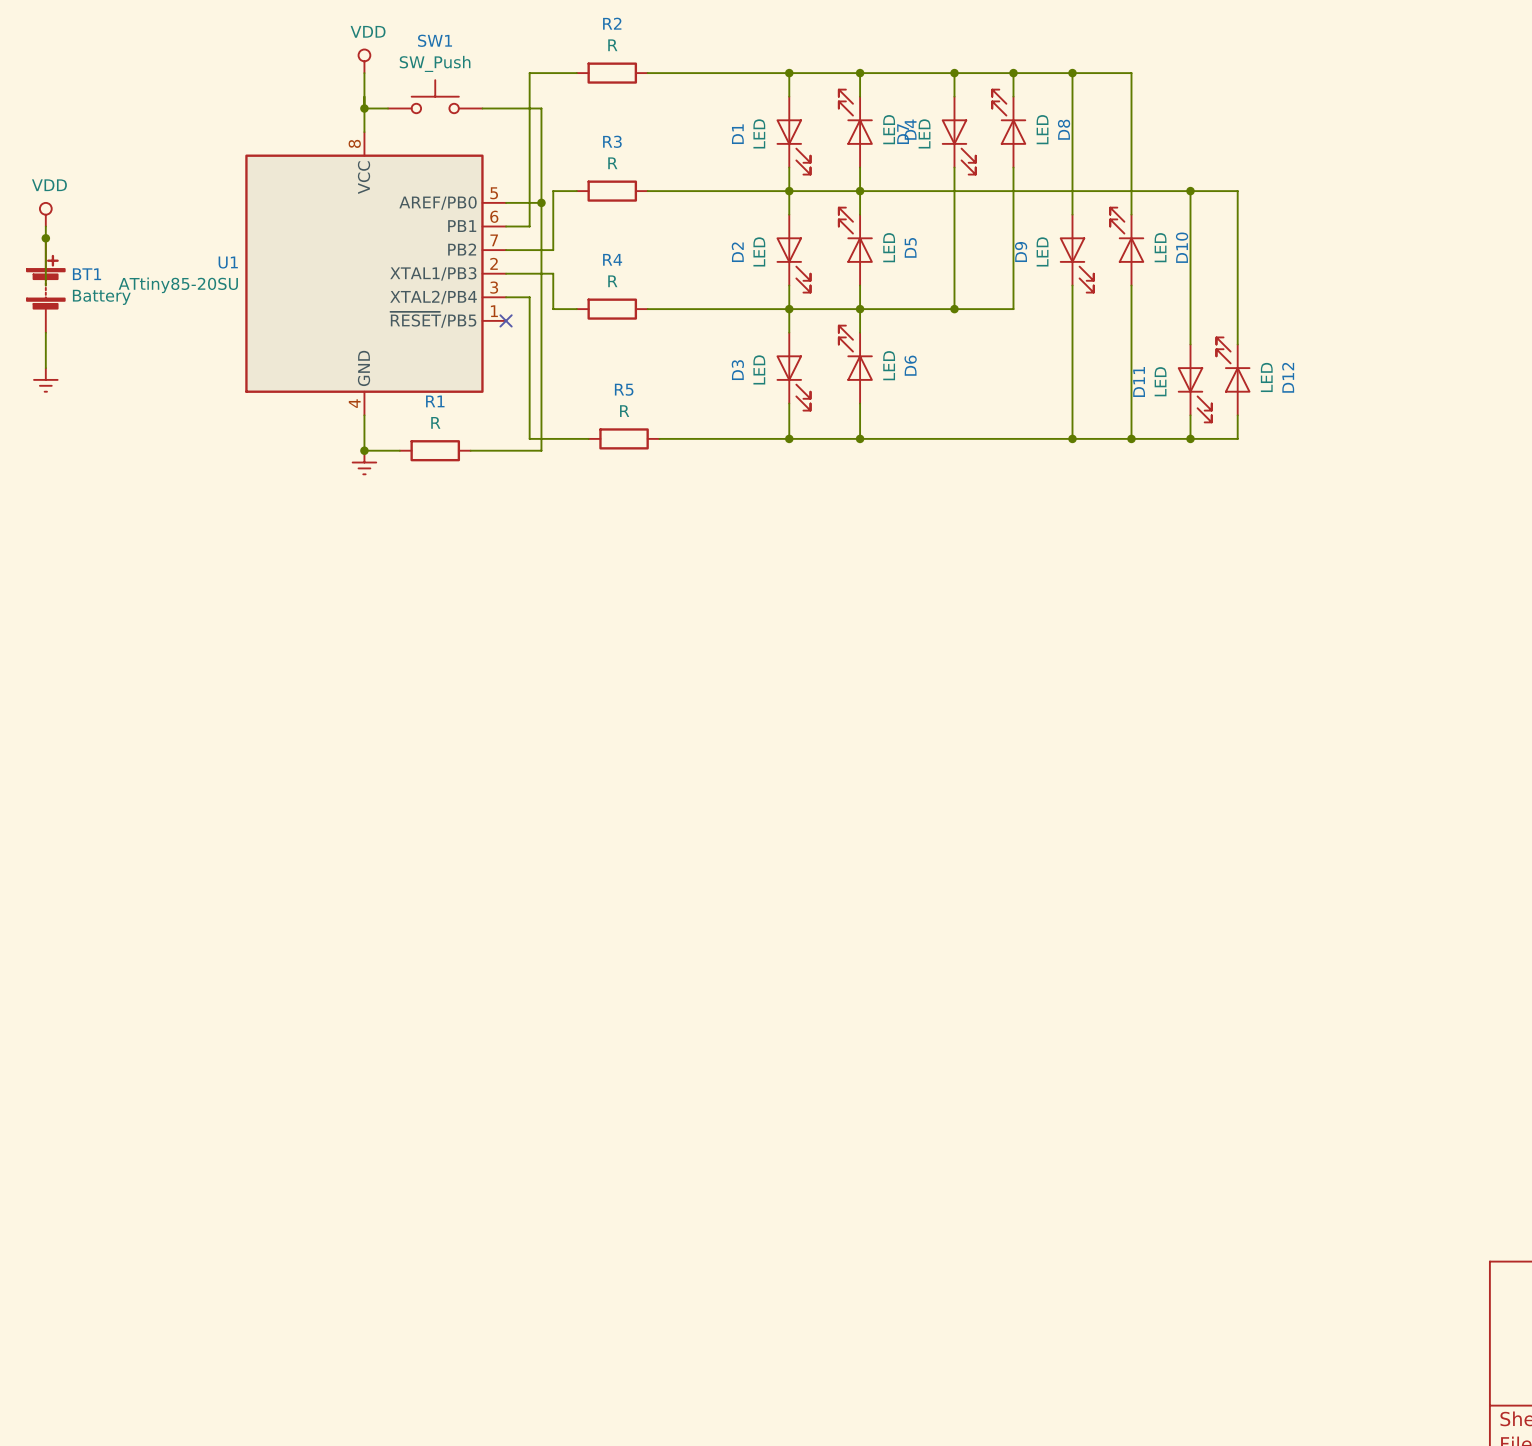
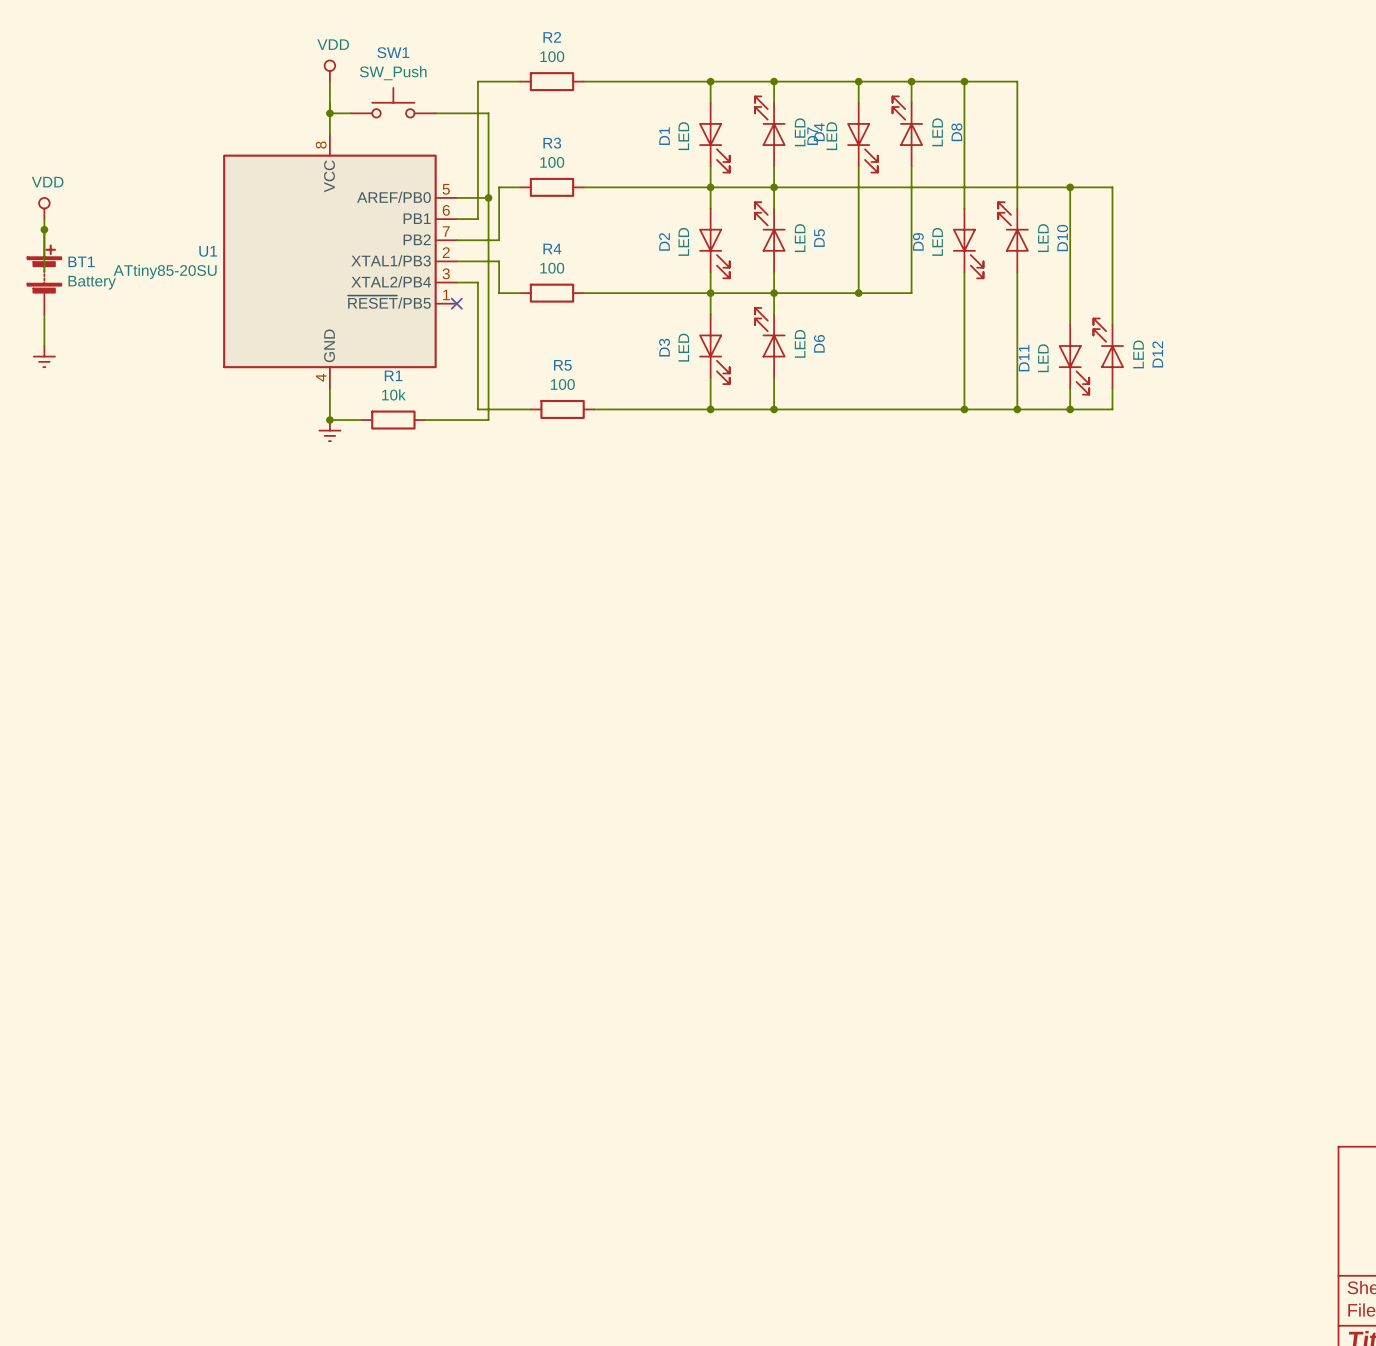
R2 value: R (612, 45) -> 100 (552, 56)
R3 value: R (612, 163) -> 100 (552, 162)
R4 value: R (612, 281) -> 100 (552, 268)
R5 value: R (624, 411) -> 100 (562, 384)
R1 value: R (435, 422) -> 10k (393, 394)

